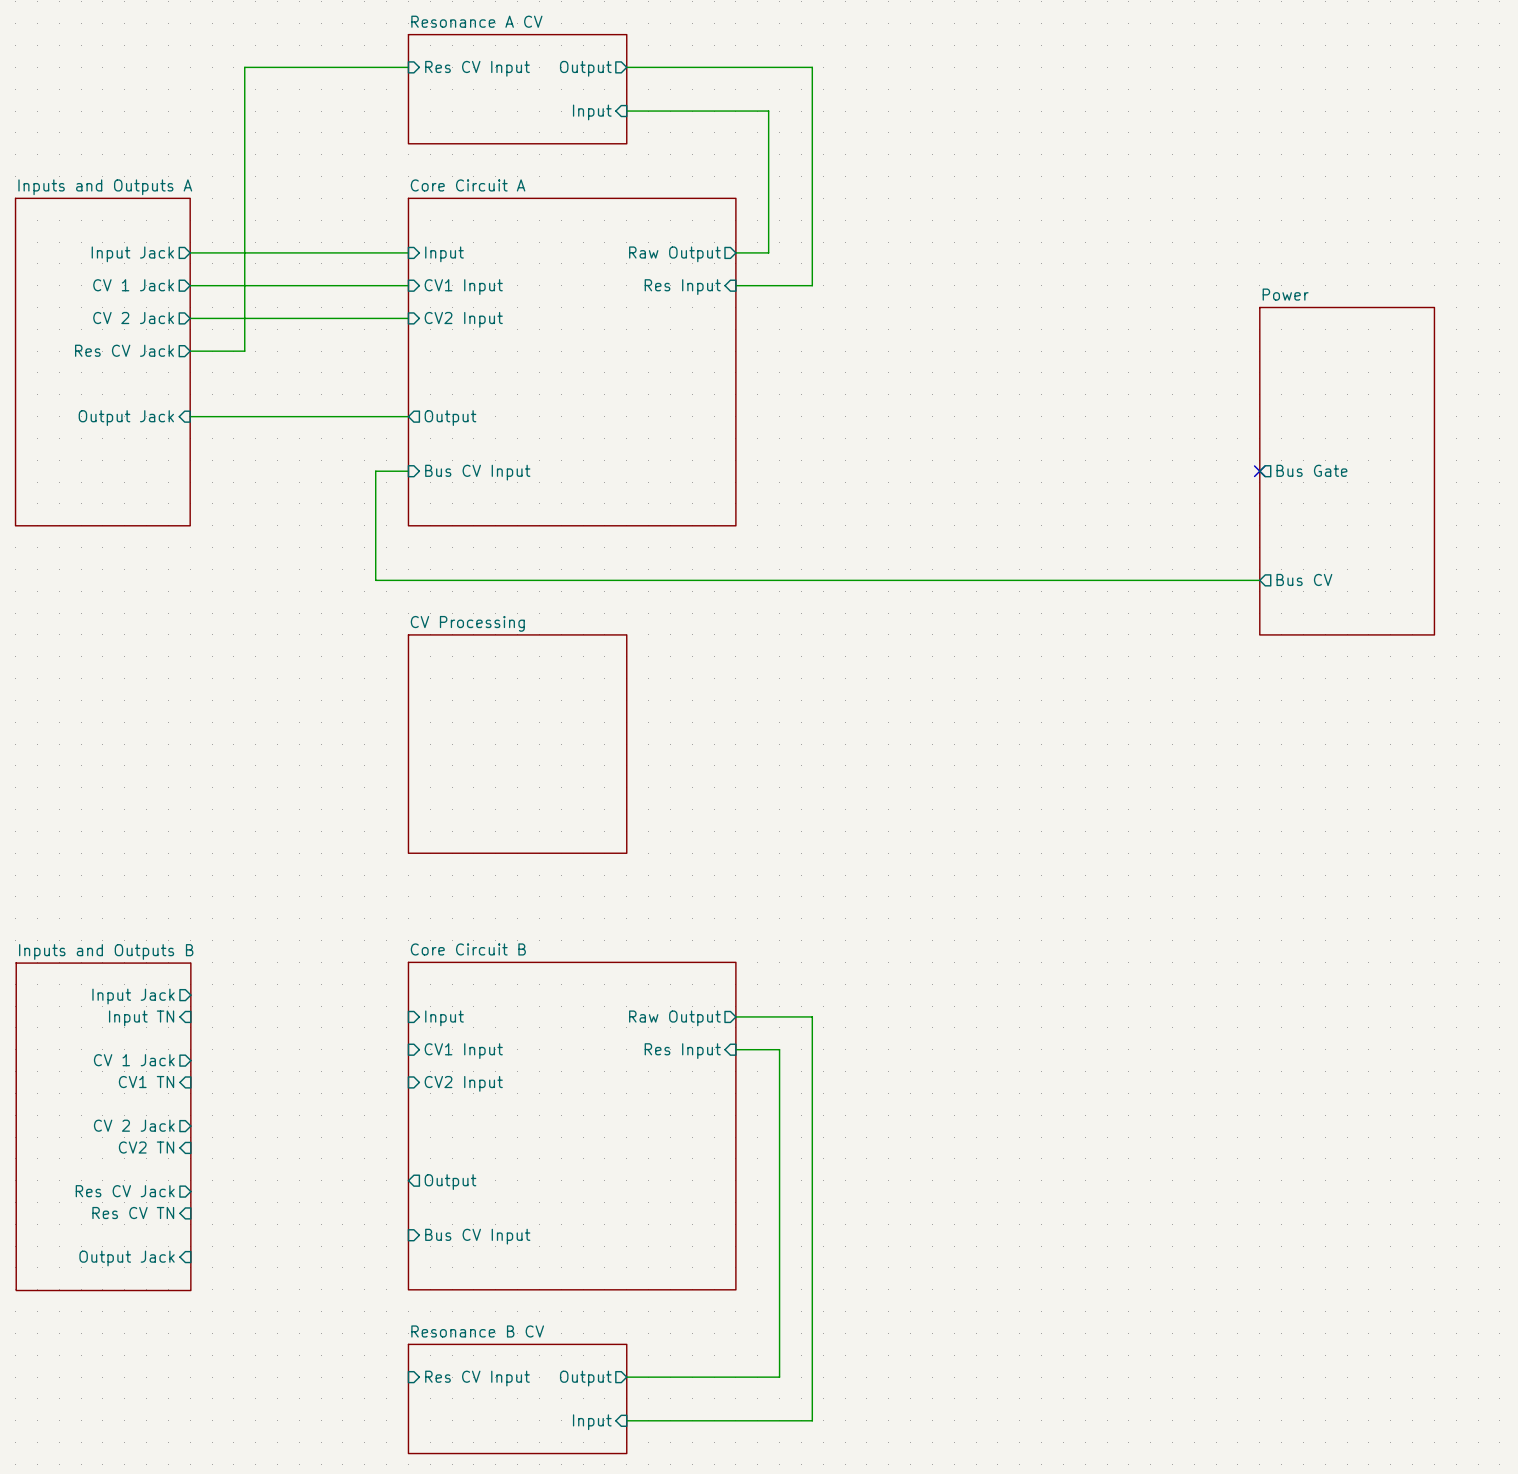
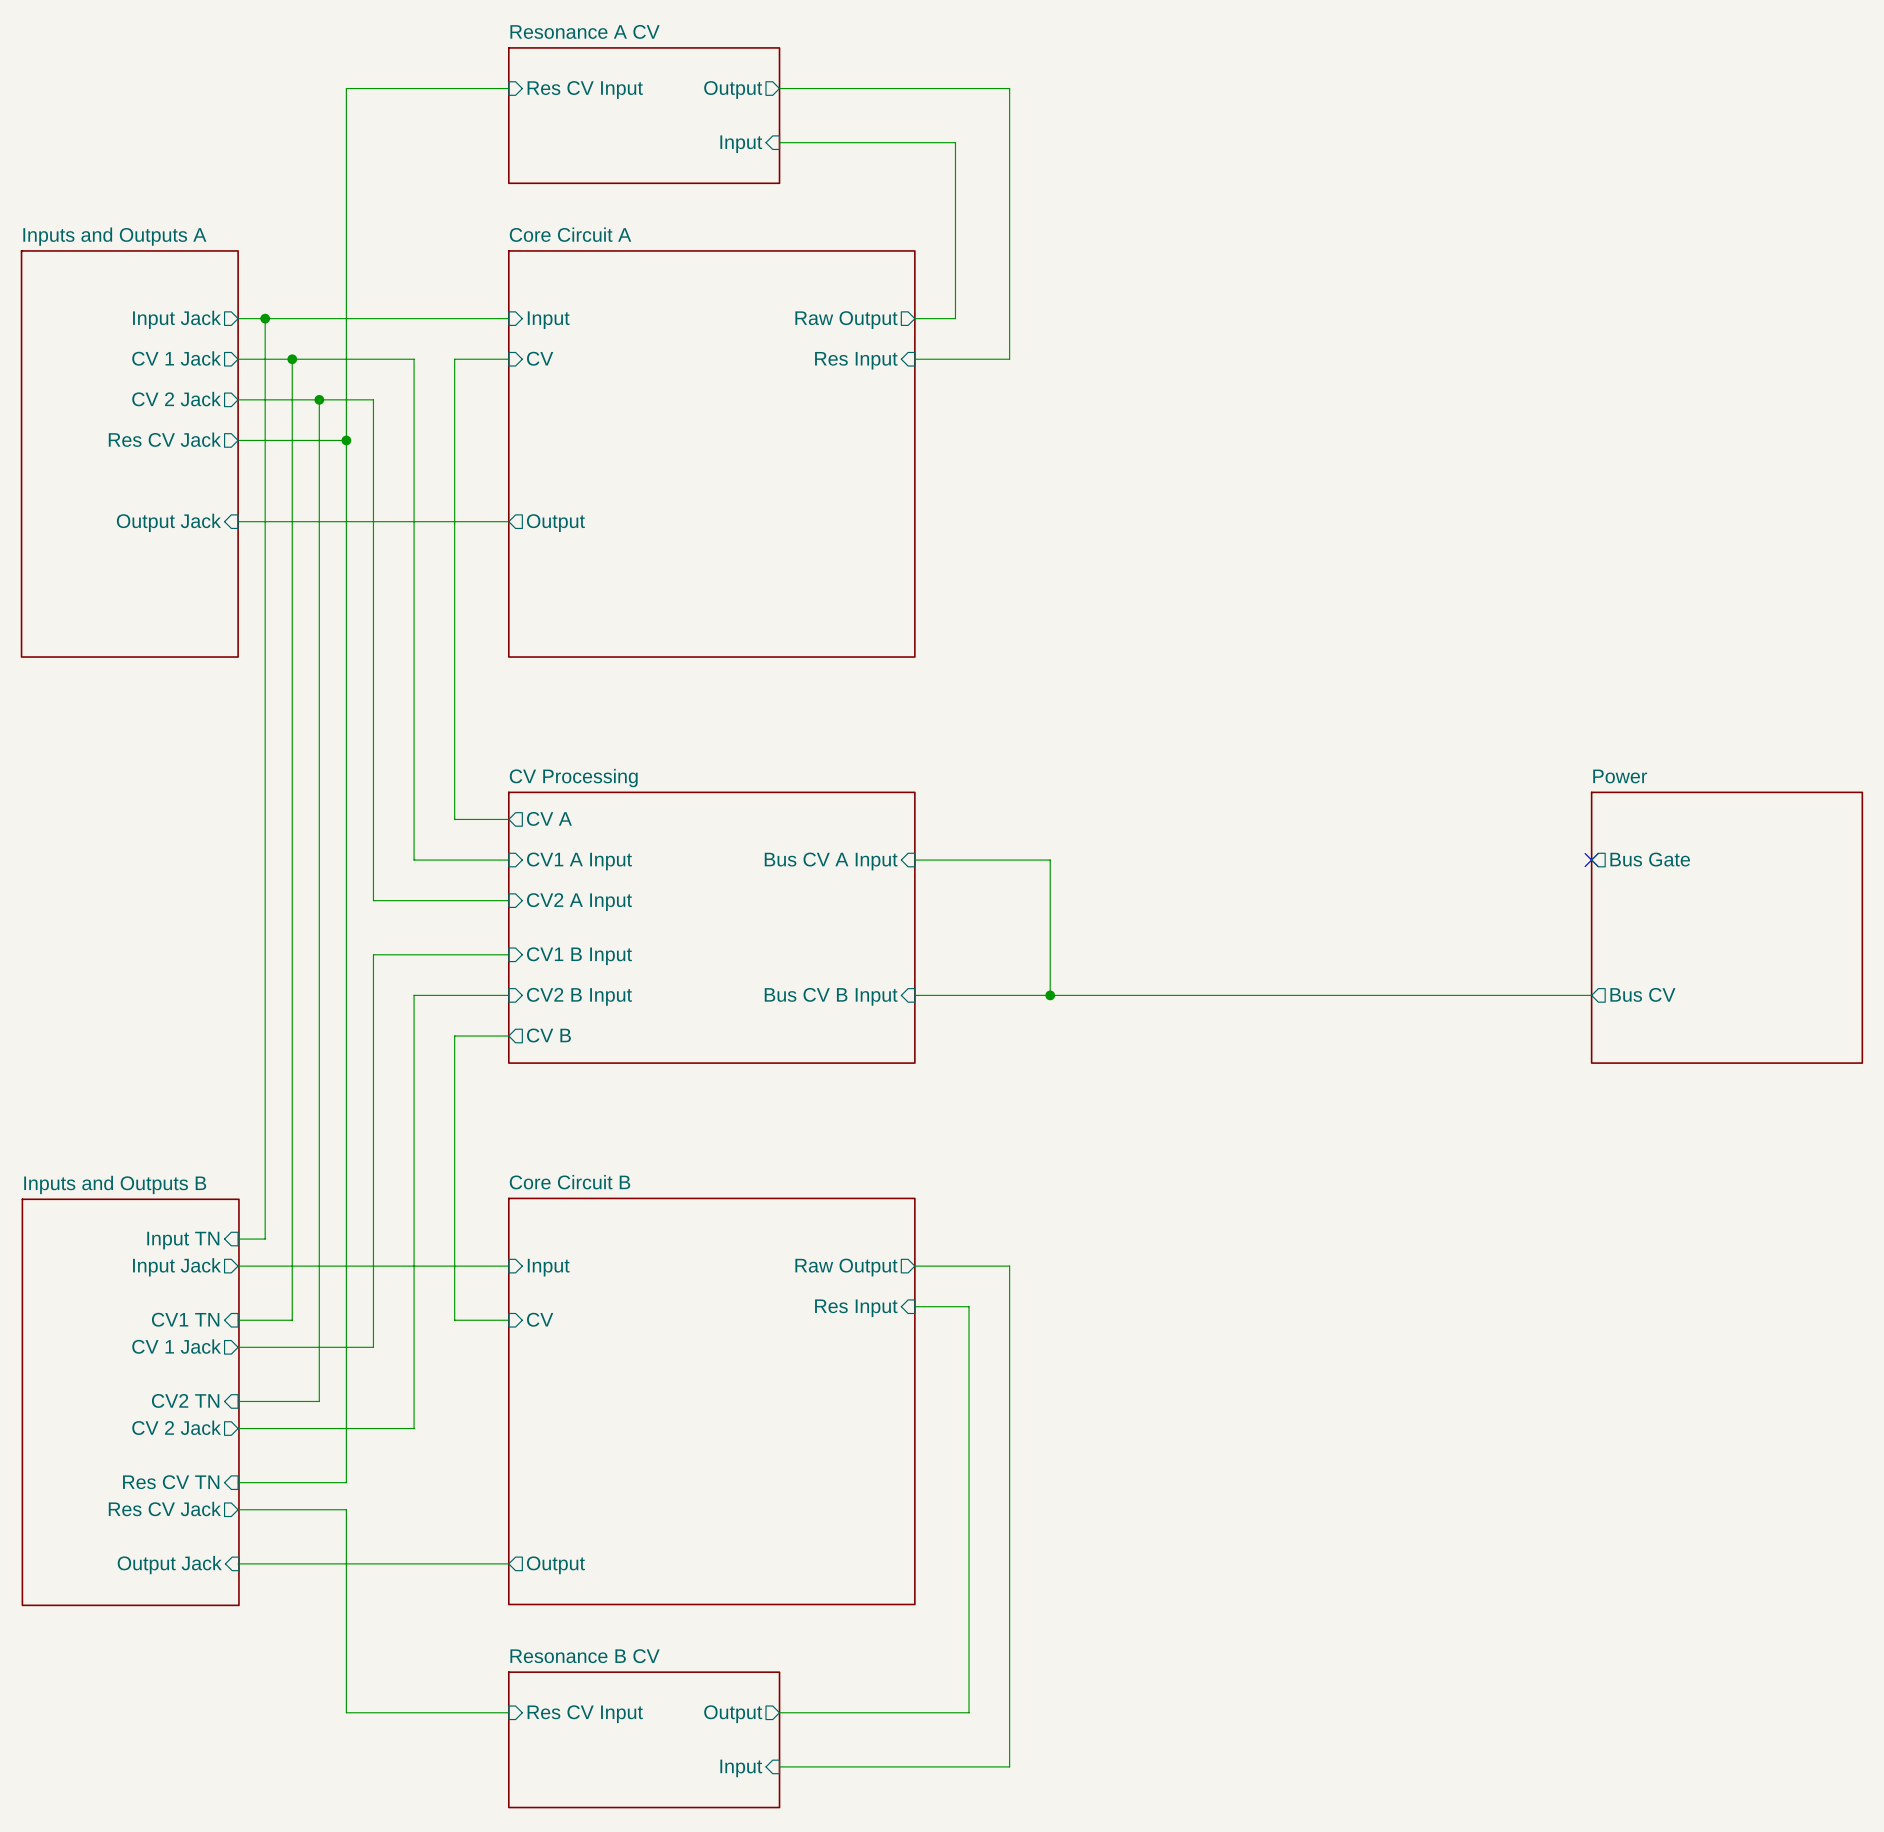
wire: (277, 67) (244, 67) (244, 351) -> (346, 440) (305, 440)
wire: none -> (346, 88) (346, 1482) (238, 1482)
wire: none -> (265, 318) (265, 1239) (238, 1239)
junction: none -> (265, 318)
wire: none -> (292, 359) (292, 1320) (238, 1320)
junction: none -> (292, 359)
wire: (332, 285) (364, 285) -> (508, 819) (454, 819) (454, 359)
wire: none -> (414, 359) (414, 860) (508, 860)
sheet pin: CV1 Input (463, 287) -> CV (540, 358)
wire: none -> (319, 399) (319, 1401) (238, 1401)
junction: none -> (319, 399)
wire: (299, 318) (408, 318) -> (373, 399) (373, 900) (508, 900)
sheet pin: CV2 Input (463, 319) -> none
junction: none -> (346, 440)
sheet pin: Bus Gate (1311, 470) -> none
wire: (408, 471) (375, 471) (375, 580) (1259, 580) -> none
no-connect mark: (1259, 471) -> none
sheet Power: (1347, 471) -> none
sheet pin: Bus CV Input (477, 472) -> none
sheet pin: Bus CV (1304, 579) -> none
sheet pin: none -> CV A (549, 818)
wire: none -> (914, 860) (1050, 860) (1050, 995)
no-connect mark: none -> (1591, 860)
sheet pin: none -> Bus Gate (1650, 859)
sheet pin: none -> CV1 A Input (579, 861)
sheet pin: none -> Bus CV A Input (831, 861)
sheet pin: none -> CV2 A Input (579, 902)
sheet CV Processing: (517, 744) -> none
sheet CV Processing: none -> (711, 927)
sheet Power: none -> (1726, 927)
wire: none -> (508, 954) (373, 954) (373, 1347) (238, 1347)
sheet pin: none -> CV1 B Input (579, 956)
wire: none -> (508, 995) (414, 995) (414, 1428) (238, 1428)
wire: none -> (914, 995) (1591, 995)
junction: none -> (1050, 995)
sheet pin: none -> Bus CV (1642, 994)
sheet pin: none -> CV2 B Input (579, 996)
sheet pin: none -> Bus CV B Input (831, 996)
sheet pin: none -> CV B (548, 1035)
wire: none -> (508, 1036) (454, 1036) (454, 1320) (508, 1320)
sheet pin shape: output (133, 996) -> input (183, 1240)
sheet pin: Input Jack (133, 996) -> Input TN (183, 1240)
wire: none -> (238, 1266) (508, 1266)
sheet pin shape: input (141, 1018) -> output (176, 1267)
sheet pin: Input TN (141, 1018) -> Input Jack (176, 1267)
sheet pin: CV1 Input (463, 1051) -> none
sheet pin shape: output (134, 1060) -> input (185, 1319)
sheet pin: CV 1 Jack (134, 1060) -> CV1 TN (185, 1319)
sheet pin: none -> CV (540, 1319)
sheet pin shape: input (146, 1082) -> output (176, 1346)
sheet pin: CV1 TN (146, 1082) -> CV 1 Jack (176, 1346)
sheet pin: CV2 Input (463, 1083) -> none
sheet pin shape: output (134, 1125) -> input (185, 1400)
sheet pin: CV 2 Jack (134, 1125) -> CV2 TN (185, 1400)
sheet pin shape: input (146, 1147) -> output (176, 1427)
sheet pin: CV2 TN (146, 1147) -> CV 2 Jack (176, 1427)
sheet pin position: Output (450, 1182) -> Output (555, 1565)
sheet pin shape: output (125, 1191) -> input (171, 1482)
sheet pin: Res CV Jack (125, 1191) -> Res CV TN (171, 1482)
sheet pin shape: input (133, 1213) -> output (164, 1508)
sheet pin: Res CV TN (133, 1213) -> Res CV Jack (164, 1508)
wire: none -> (238, 1509) (346, 1509) (346, 1712) (508, 1712)
sheet pin: Bus CV Input (477, 1236) -> none
wire: none -> (238, 1563) (508, 1563)

